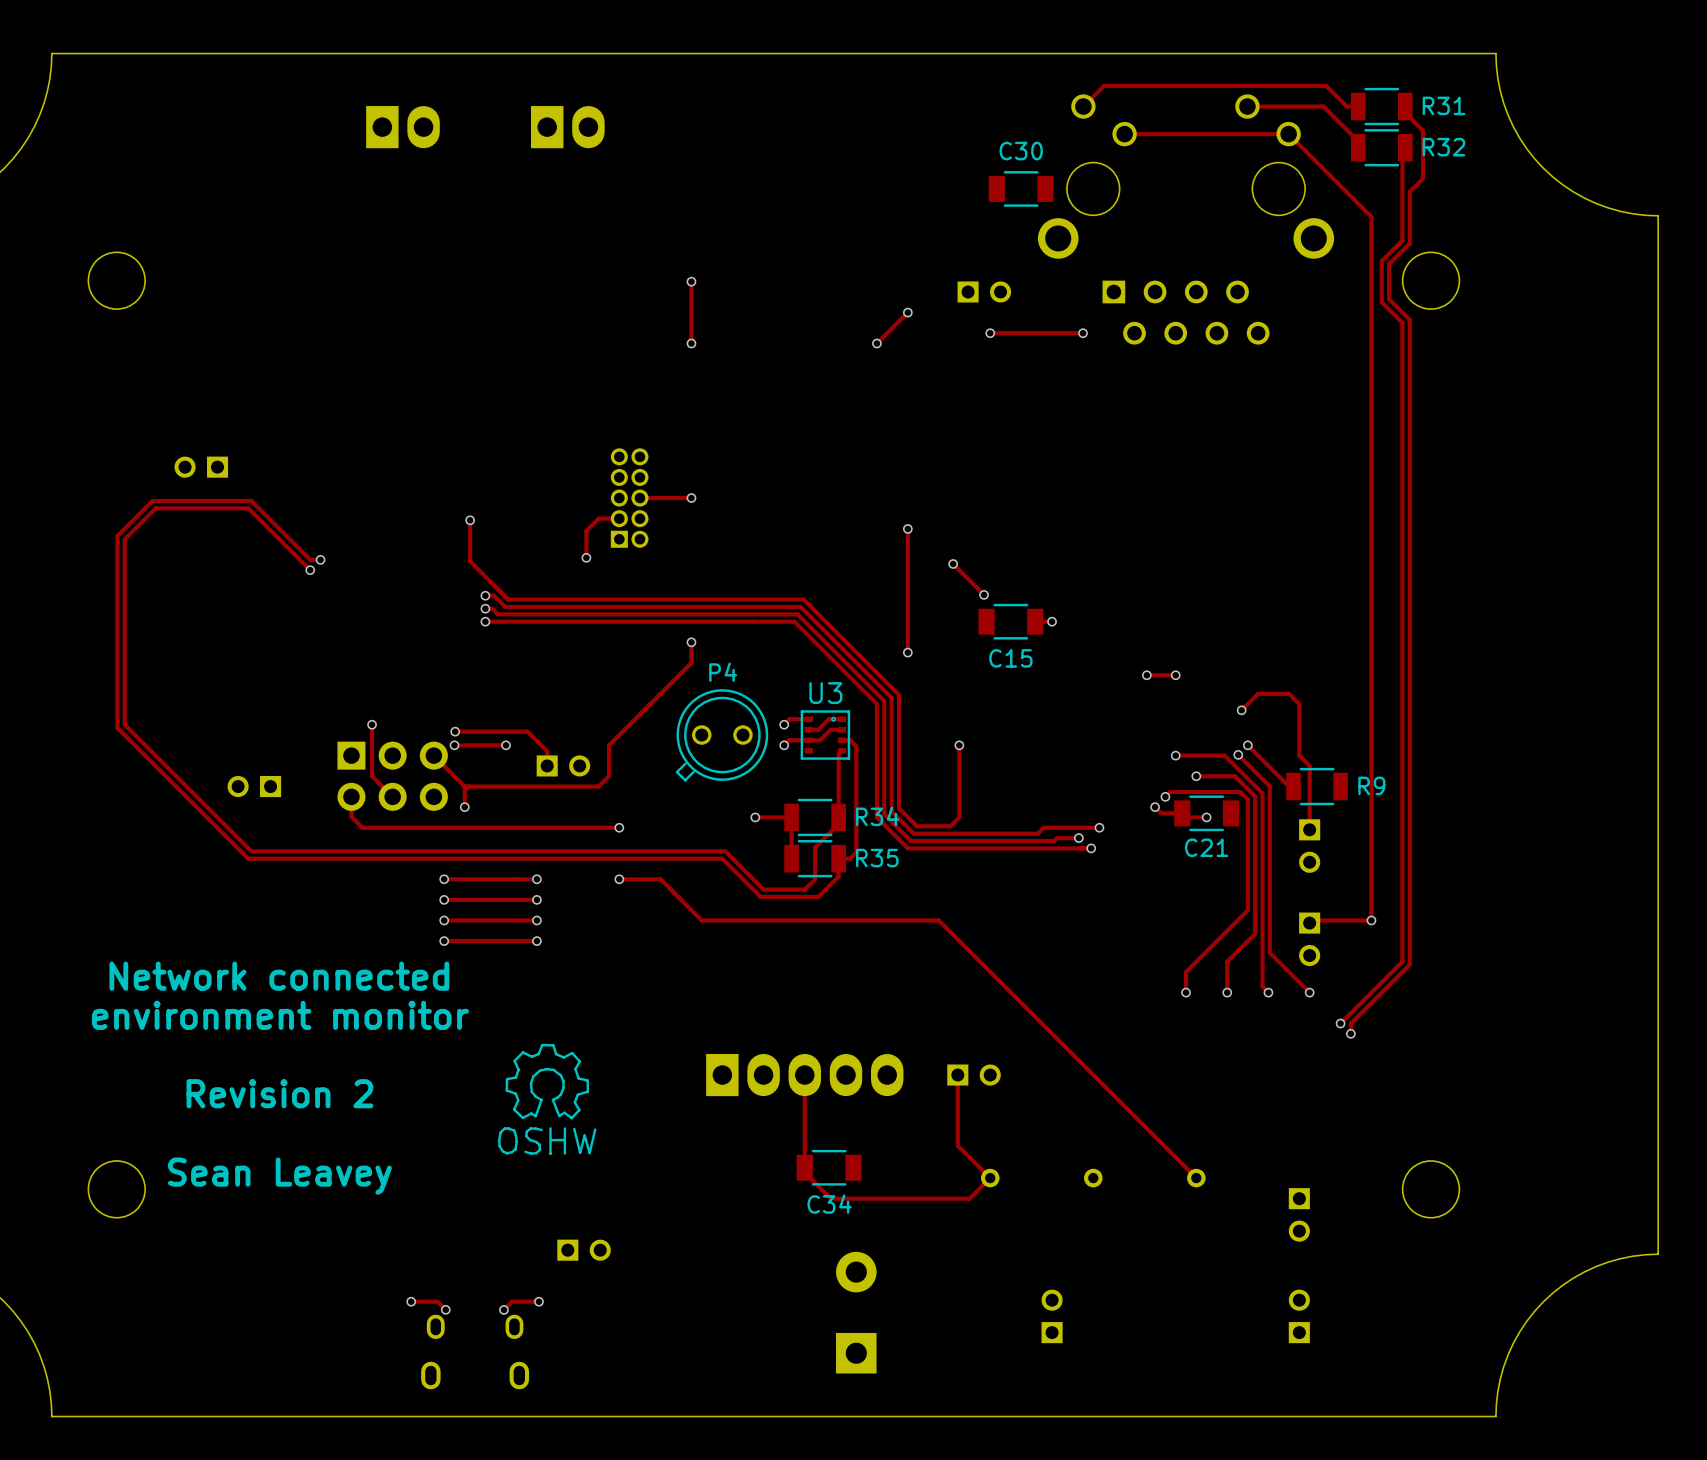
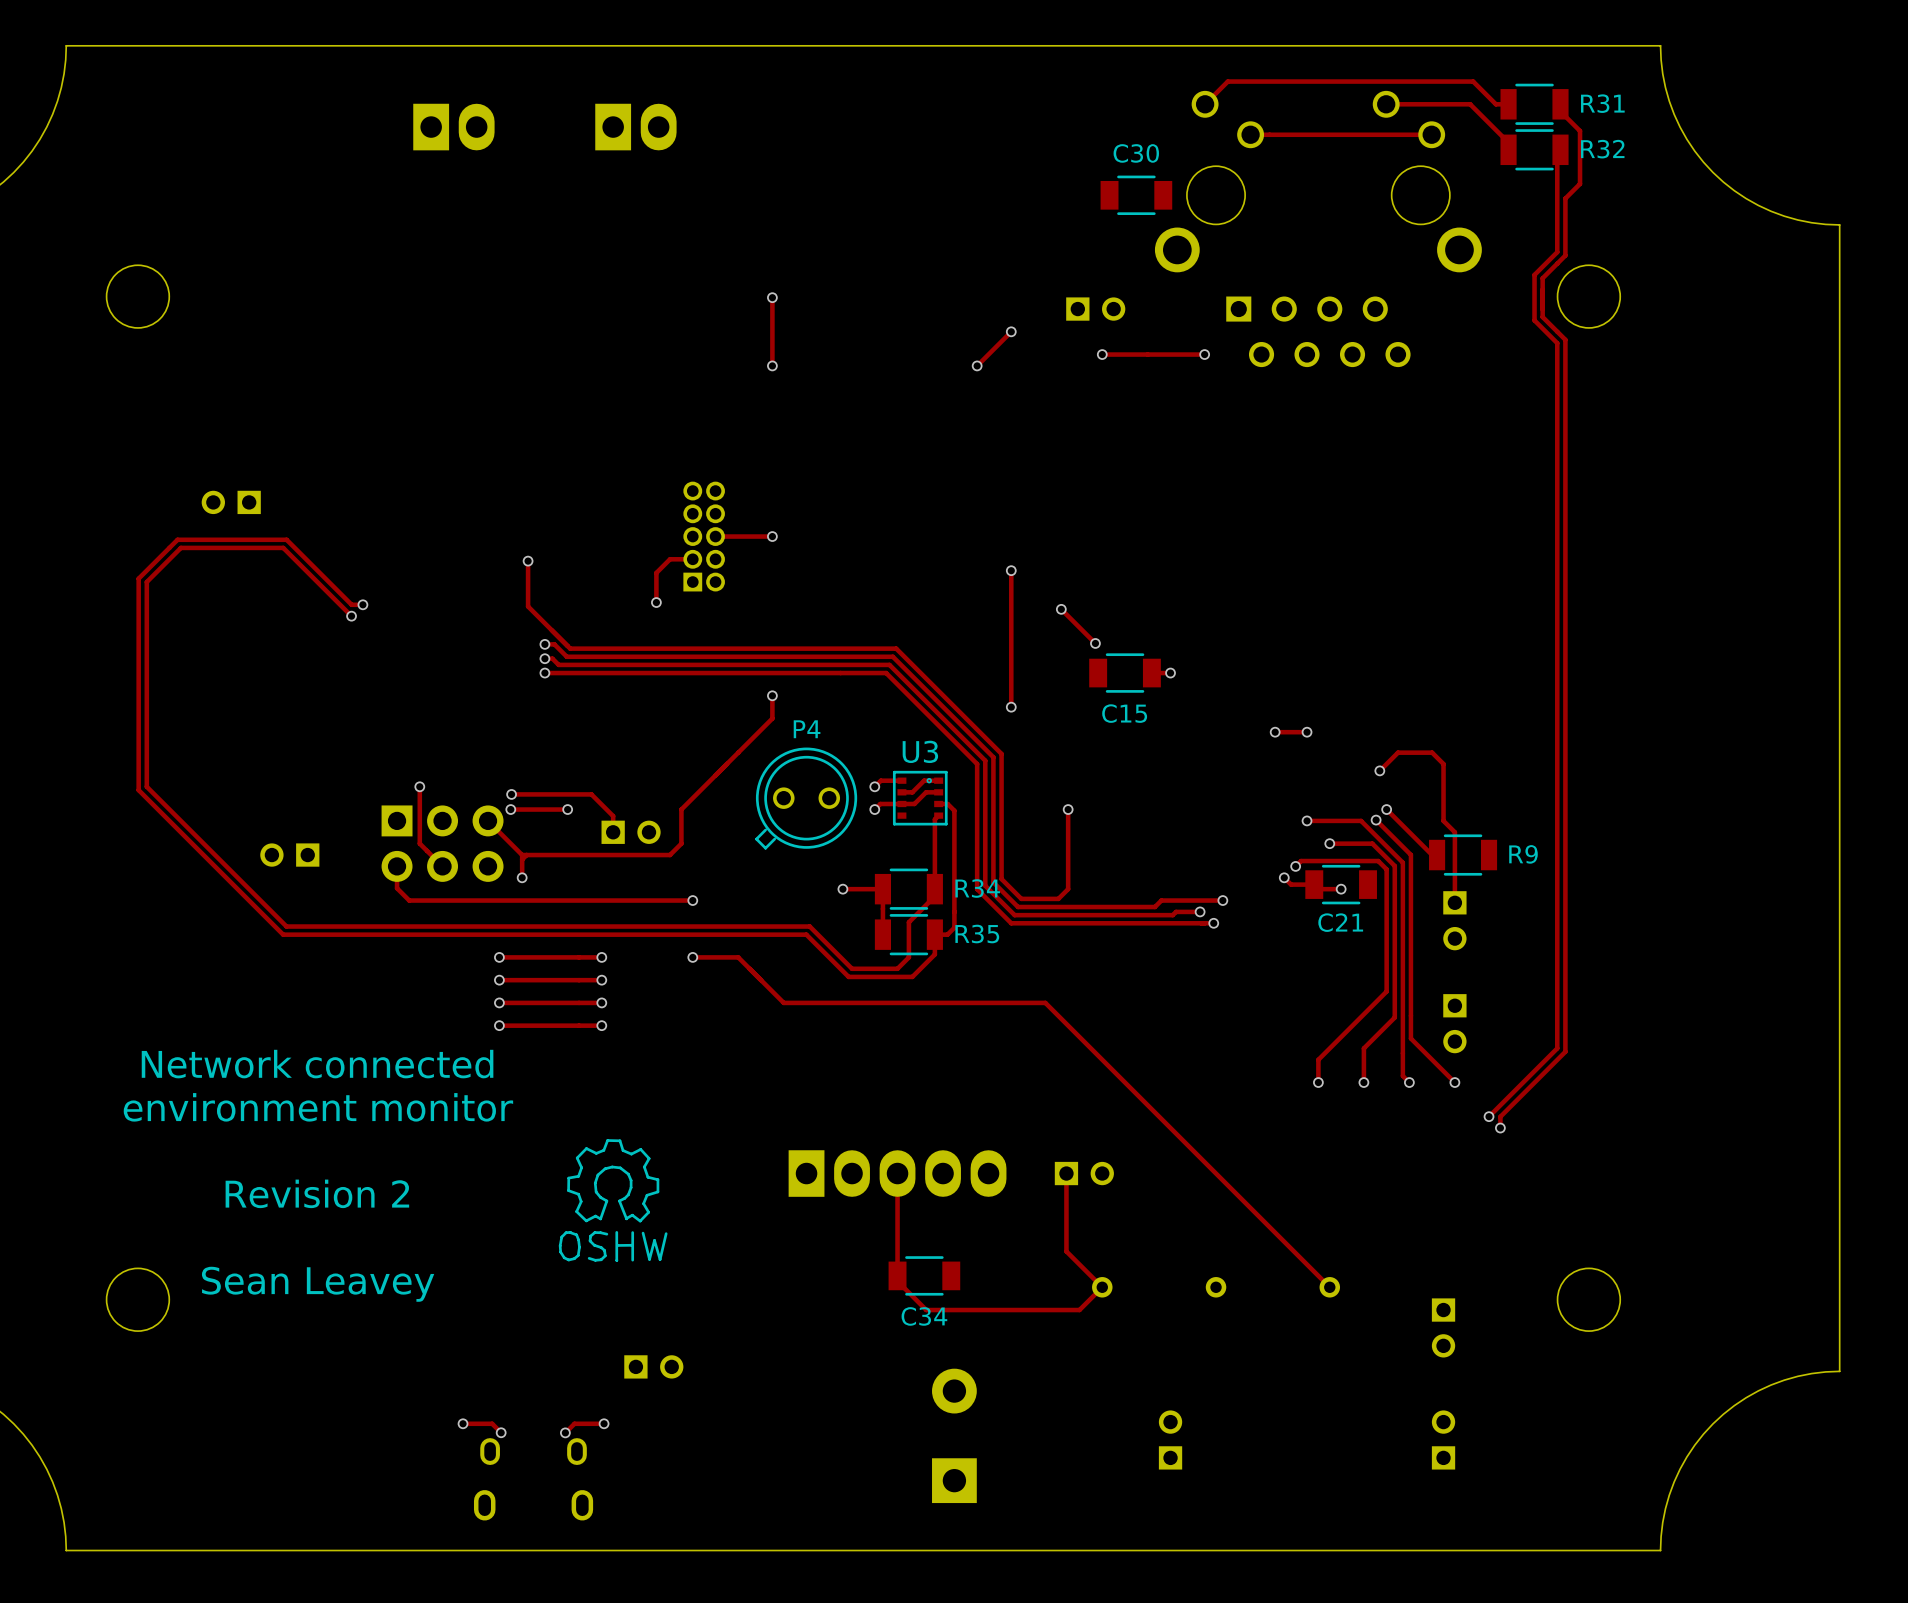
track: (1288, 134) (1371, 216) (1371, 920) (1312, 920) (1309, 923) -> none
via: (1371, 920) -> none

